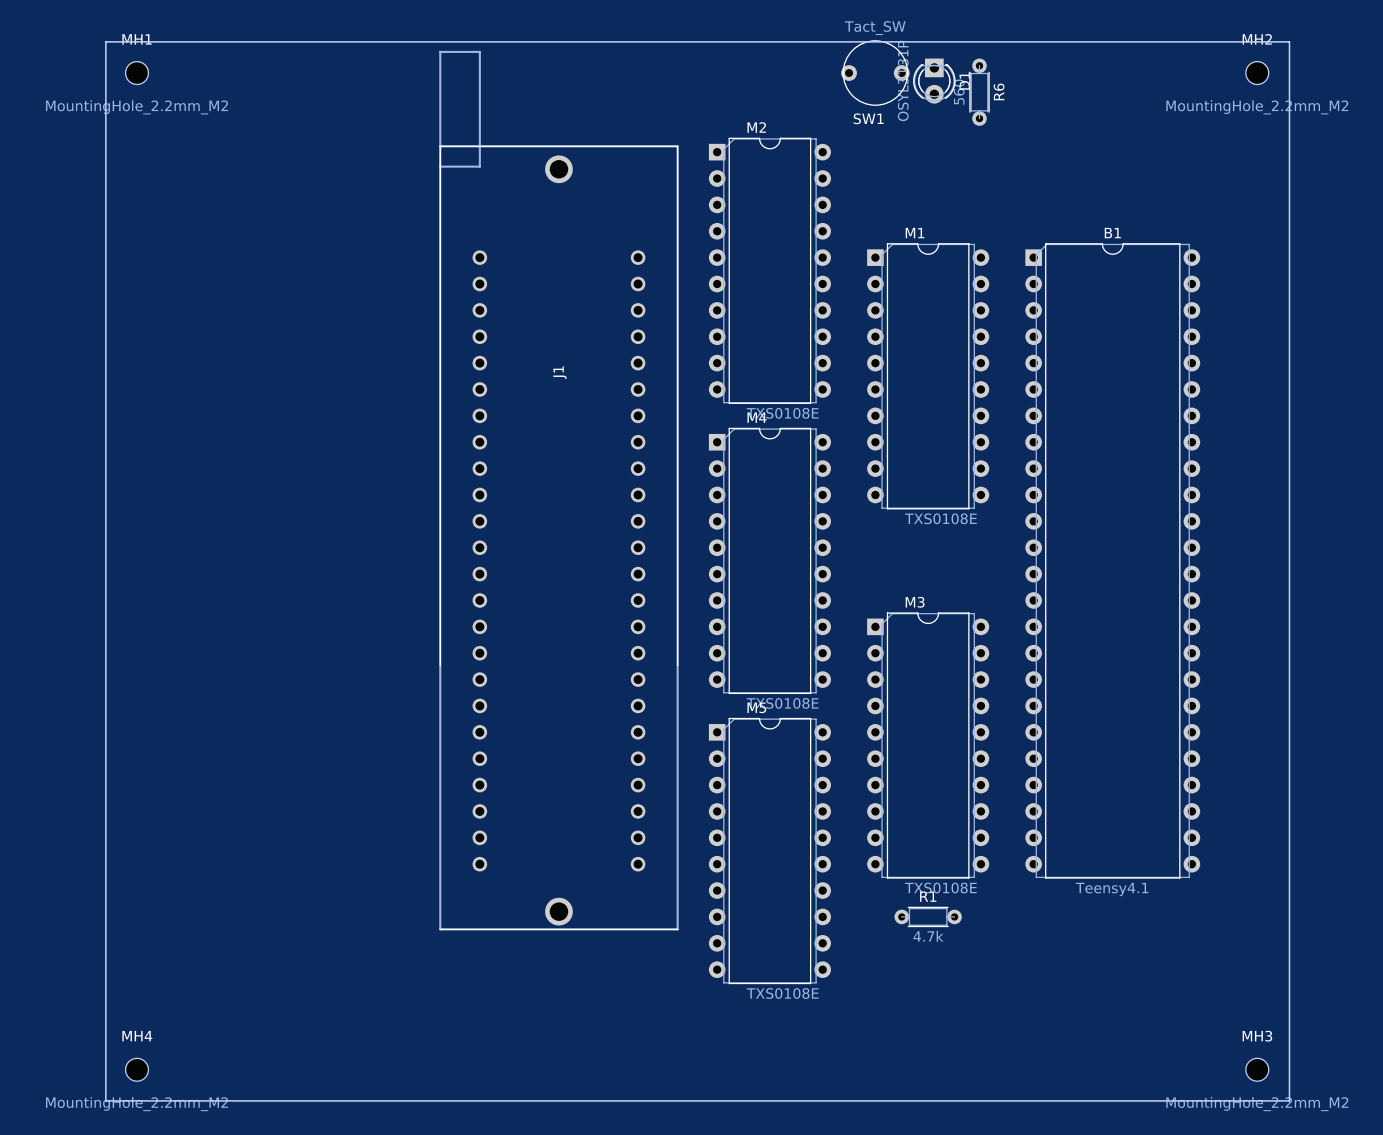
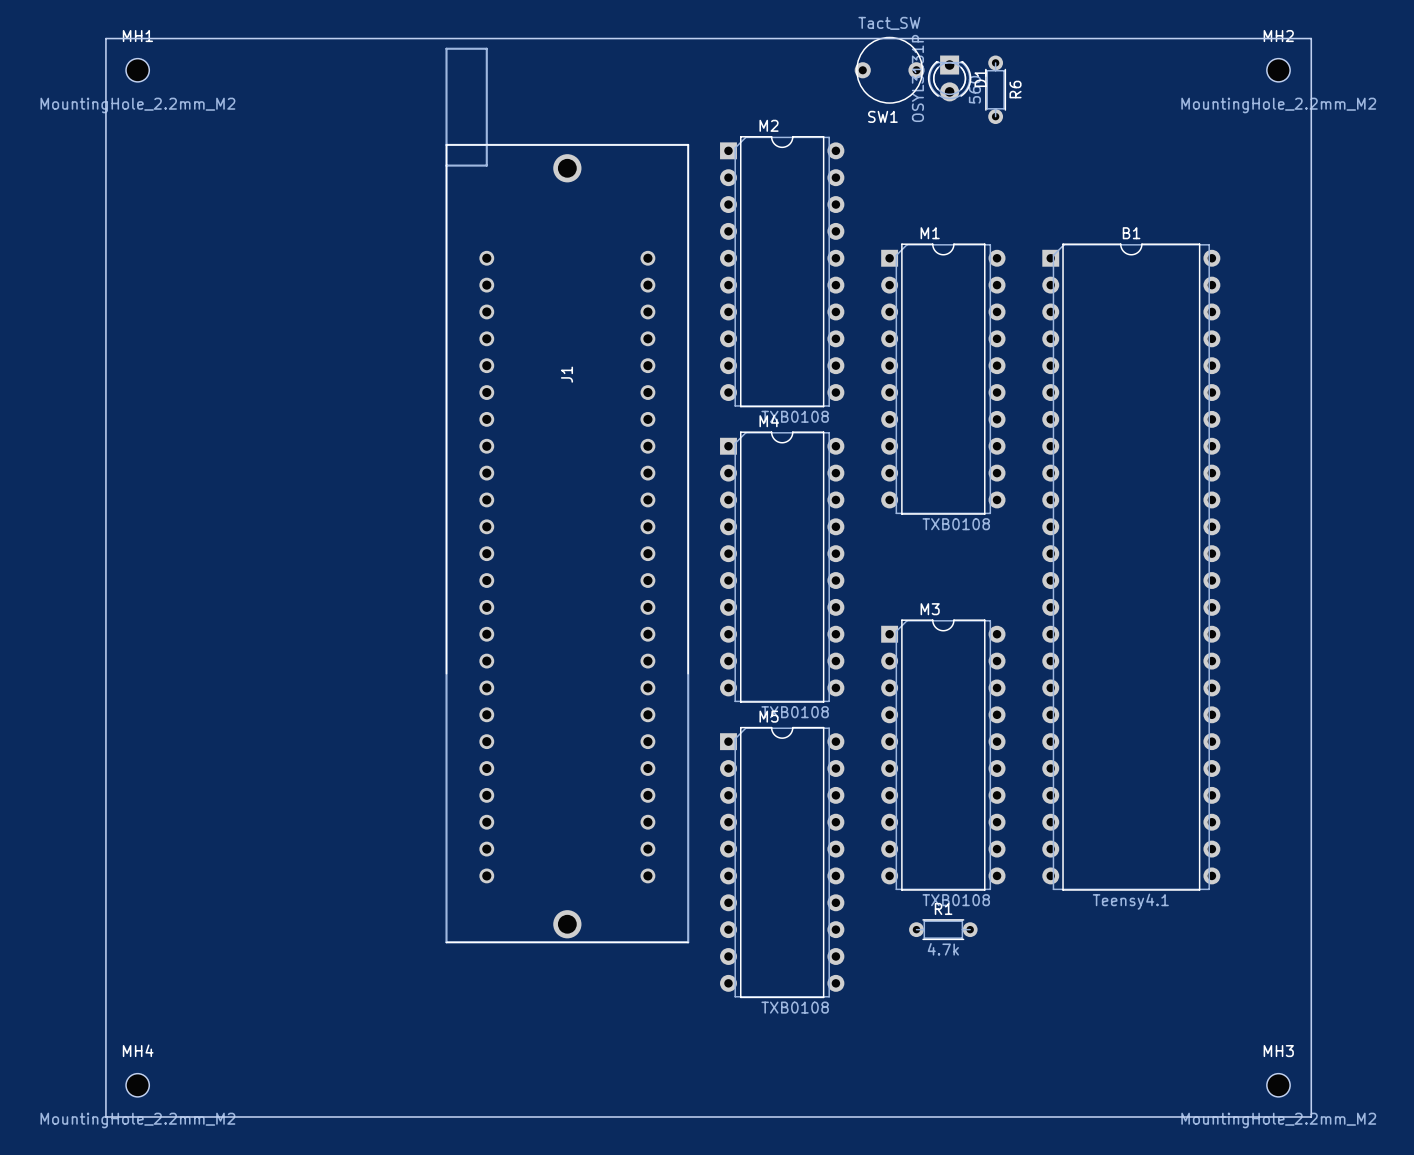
M2 value: TXS0108E (782, 413) -> TXB0108 (795, 416)
M1 value: TXS0108E (940, 518) -> TXB0108 (956, 524)
M4 value: TXS0108E (782, 703) -> TXB0108 (795, 712)
M3 value: TXS0108E (940, 888) -> TXB0108 (956, 900)
M5 value: TXS0108E (782, 993) -> TXB0108 (795, 1007)

